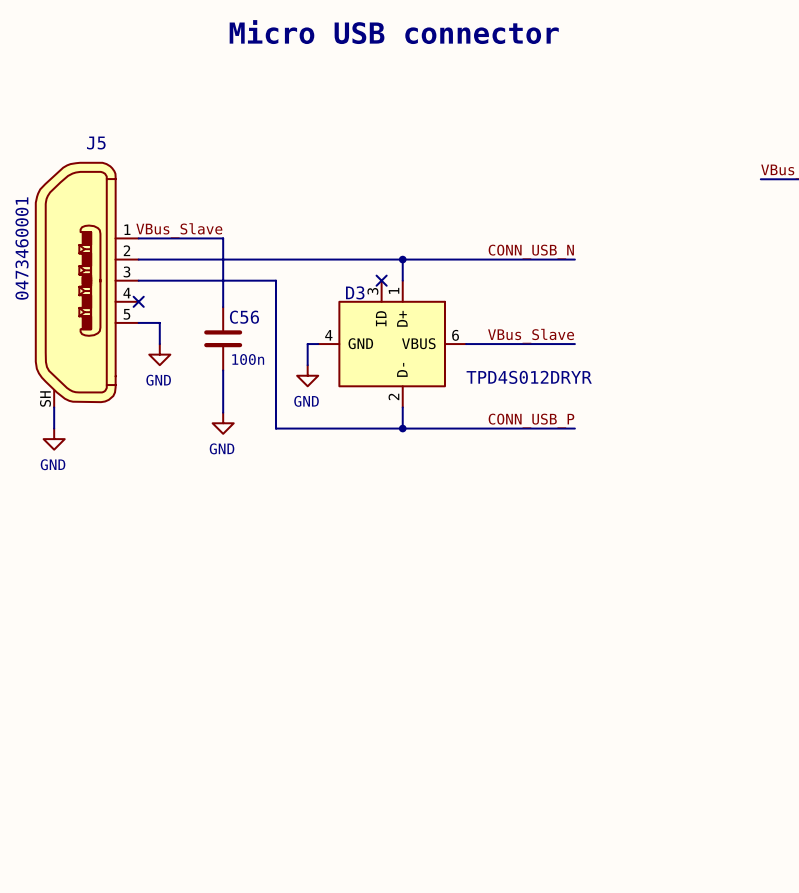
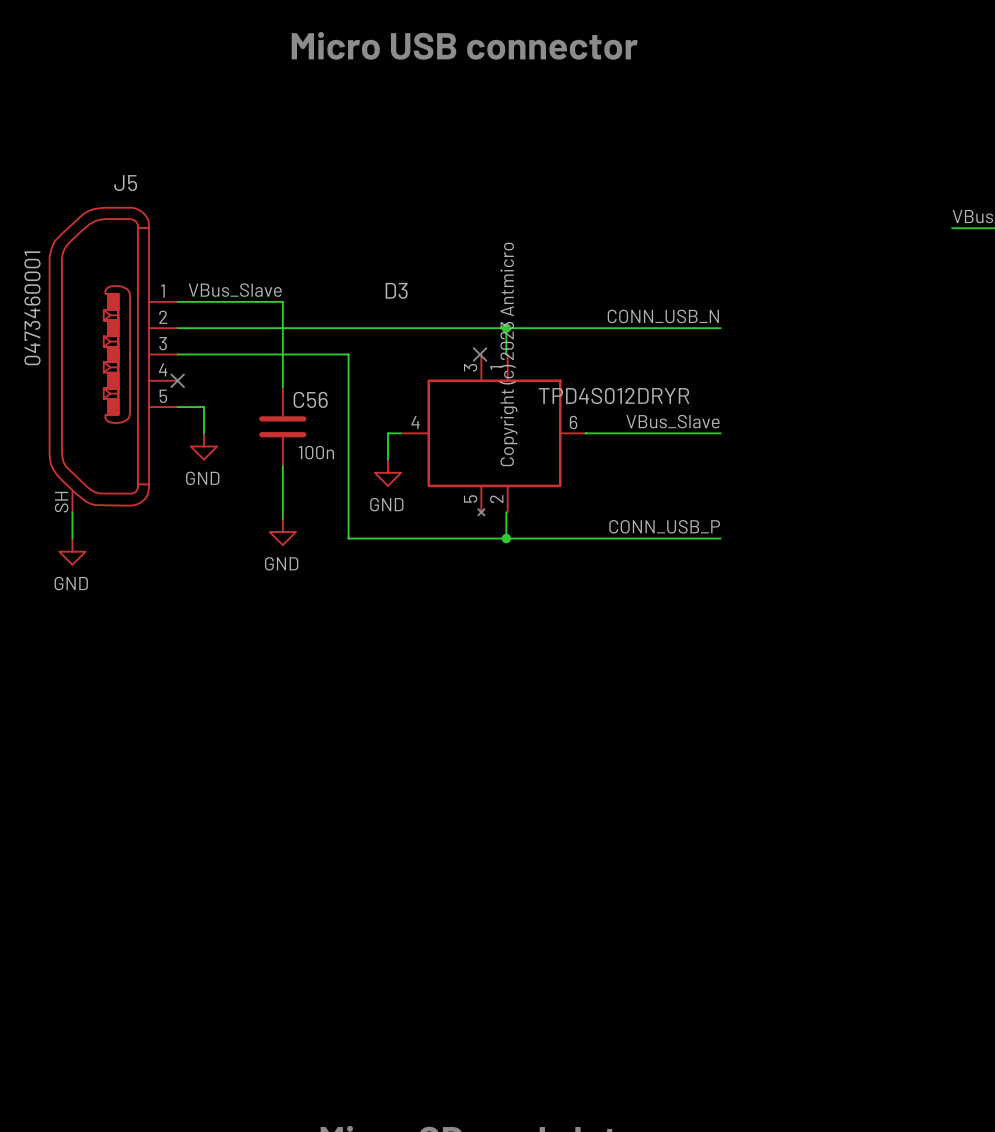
D3 symbol: [318, 280, 467, 408] -> [402, 354, 587, 516]
D3 text: none -> Copyright (c) 2023 Antmicro (508, 354)
D3 name position: D3 (355, 292) -> D3 (396, 290)
D3 value position: TPD4S012DRYR (529, 377) -> TPD4S012DRYR (614, 395)

